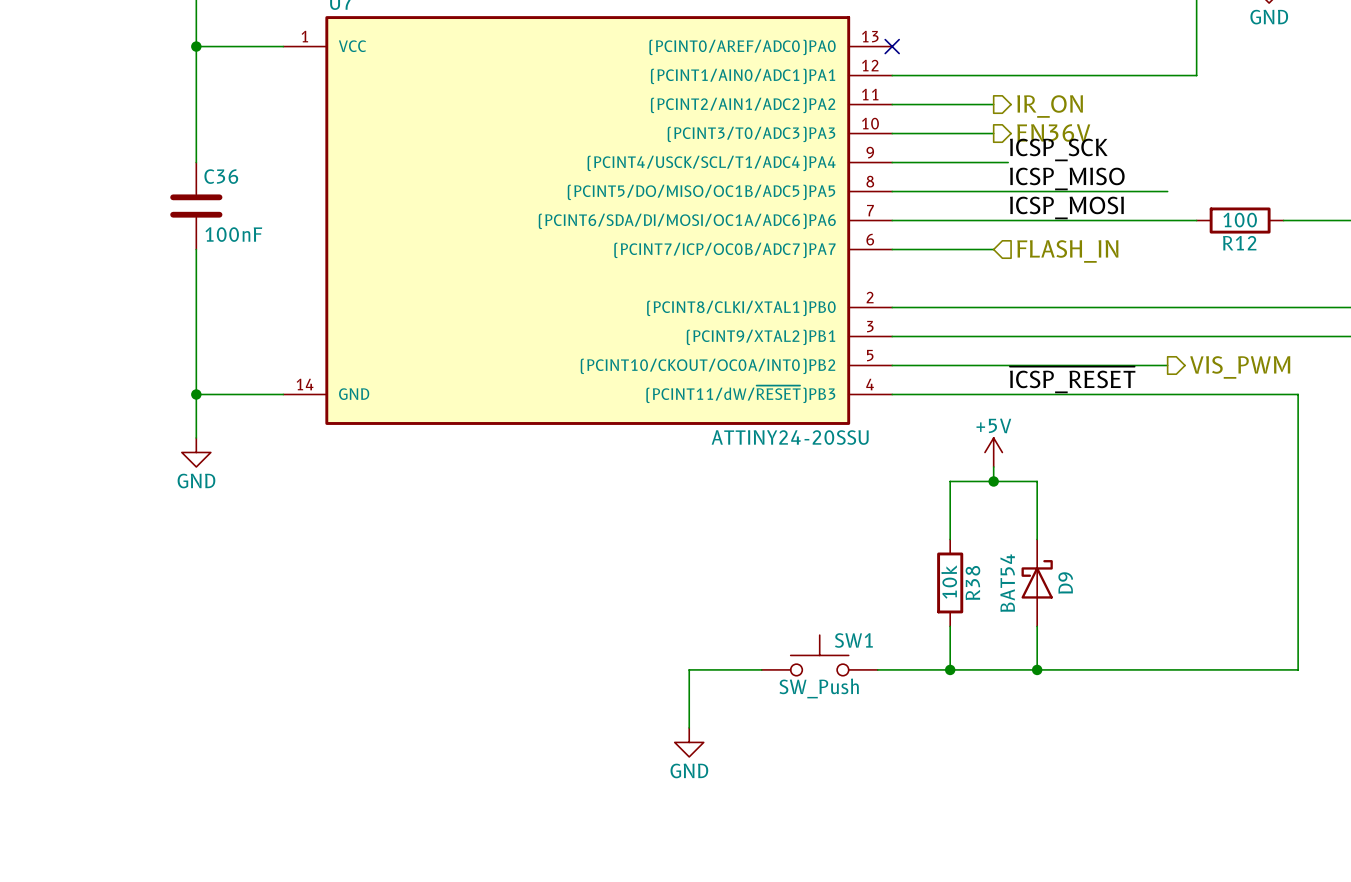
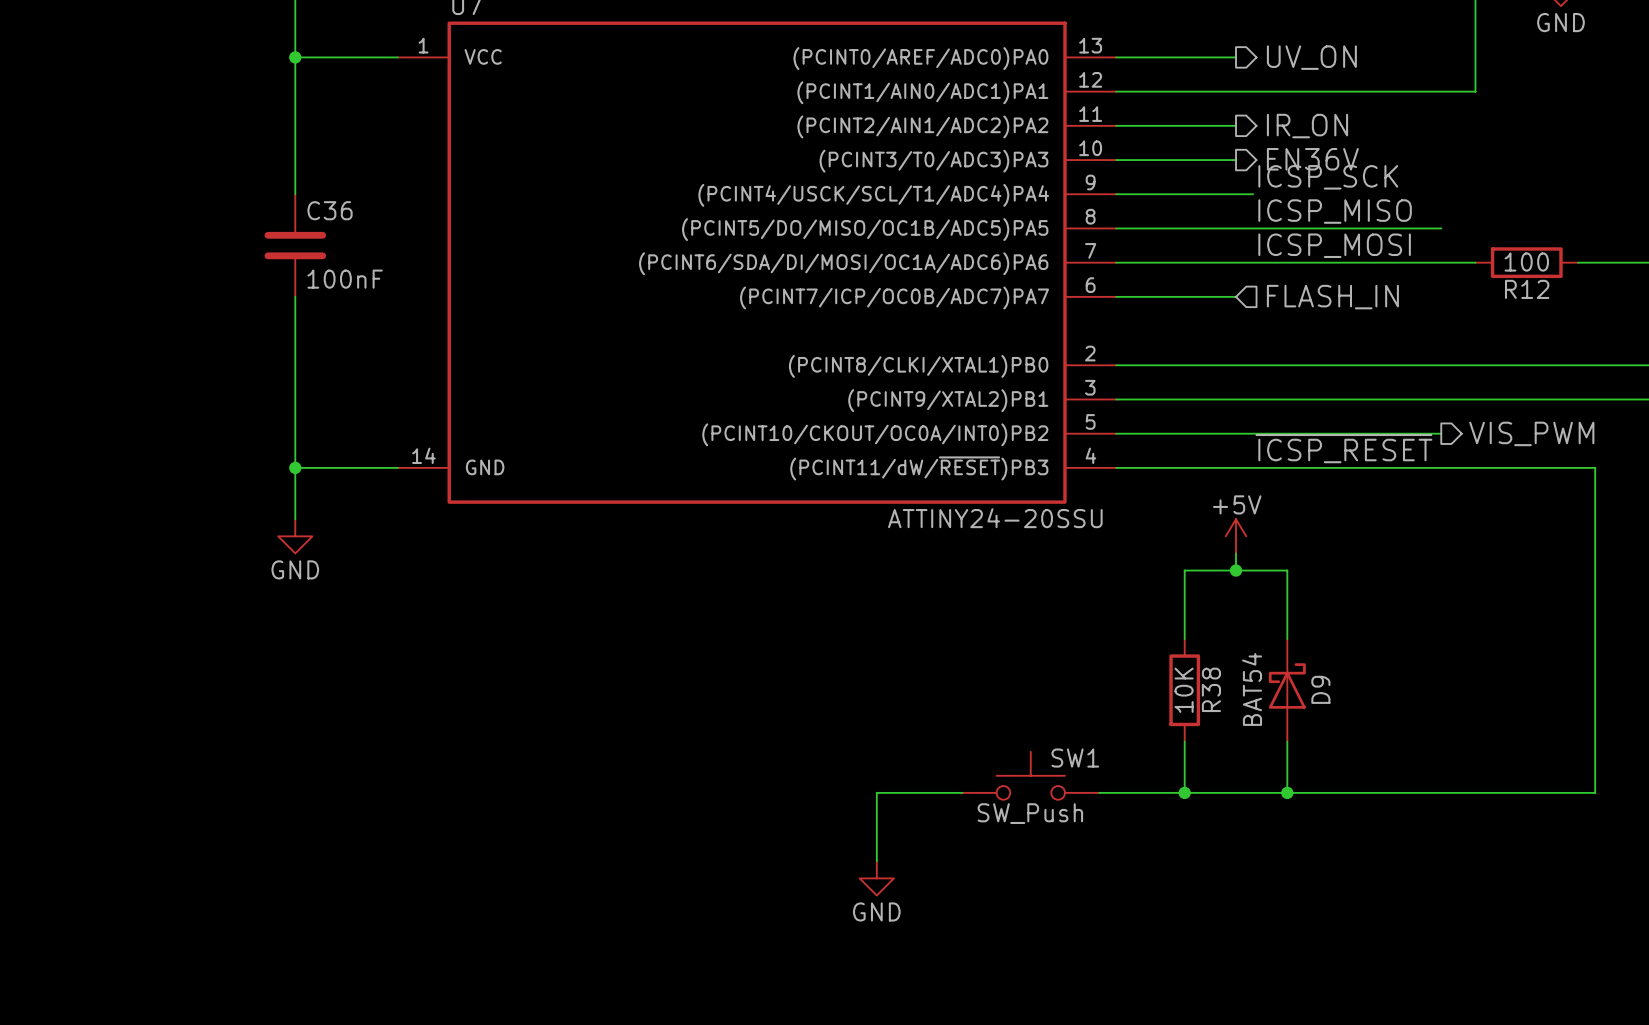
wire: none -> (1116, 57) (1236, 57)
no-connect mark: (892, 46) -> none
hierarchical label: none -> UV_ON (1311, 57)
R38 value: 10k (949, 582) -> 10K (1184, 690)

